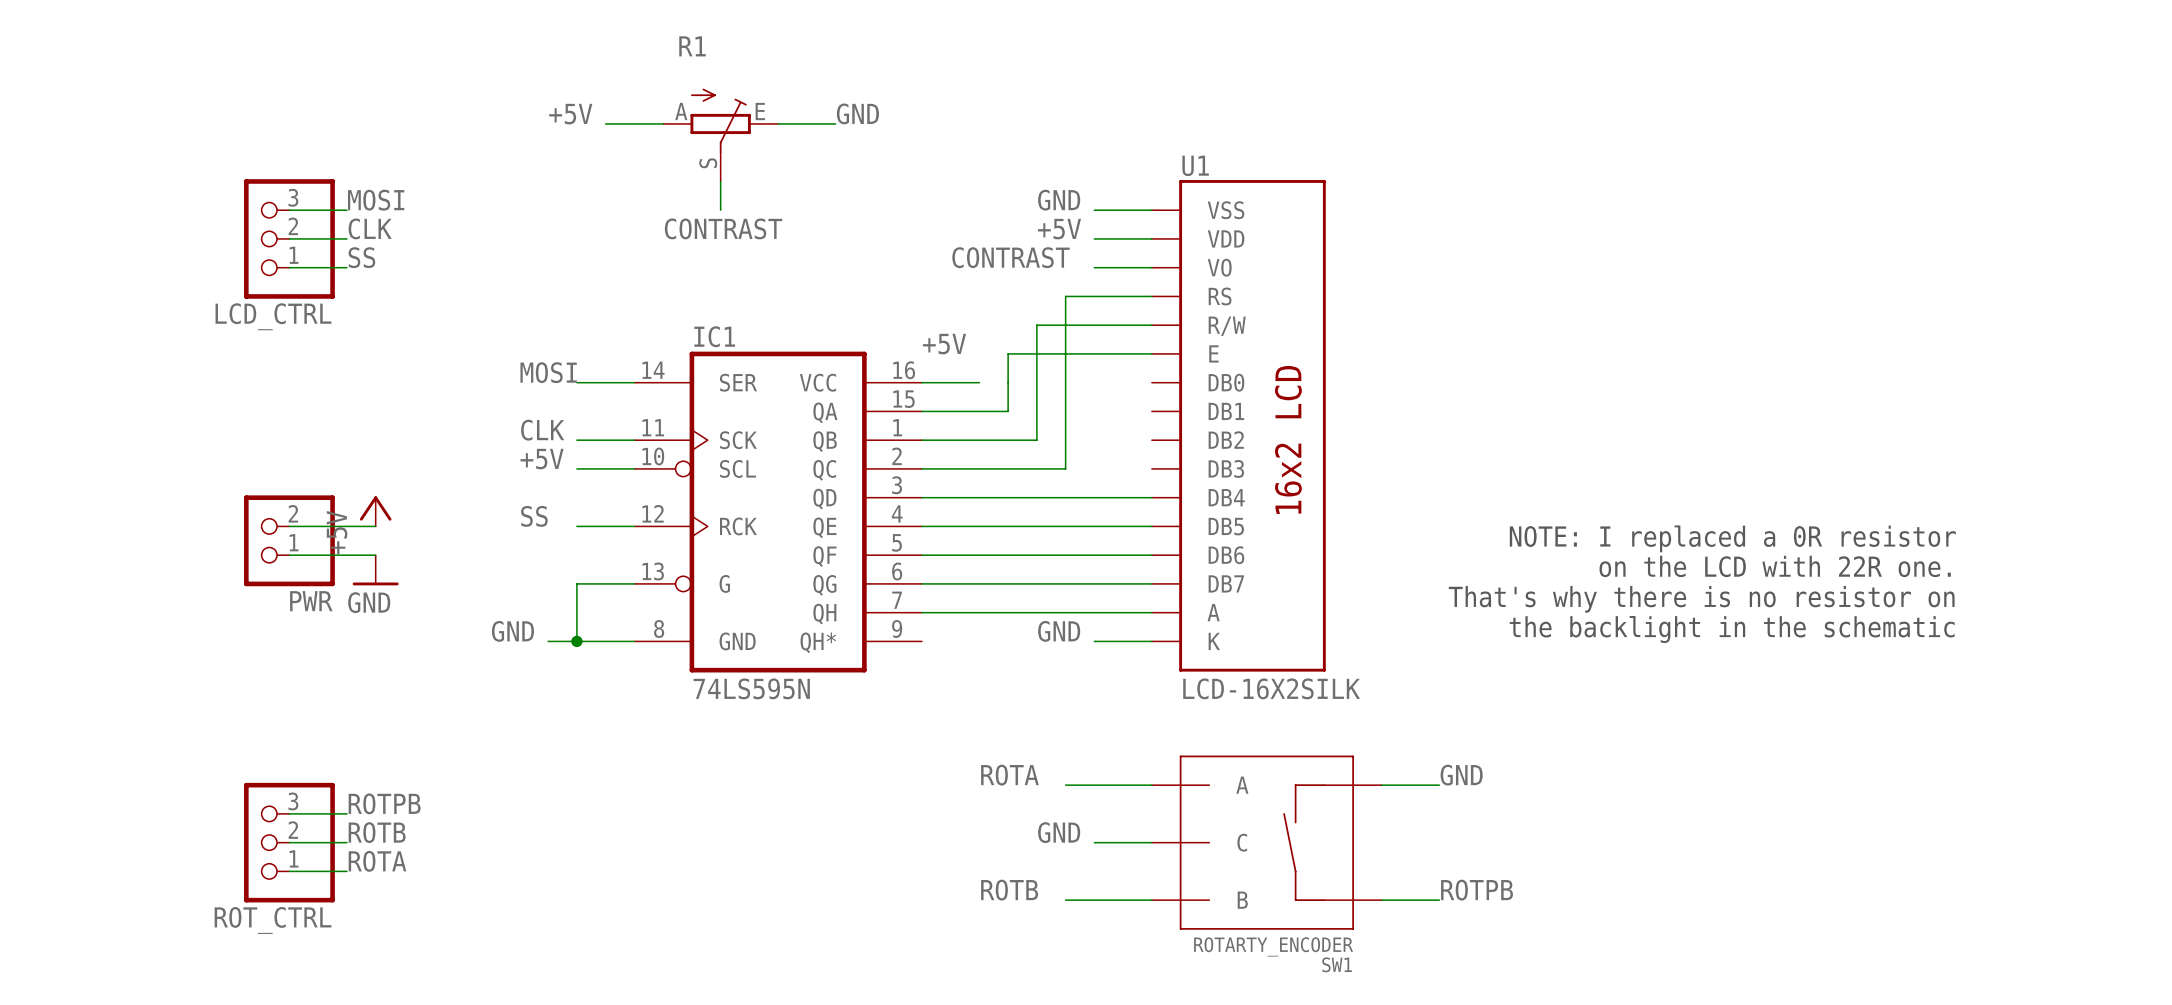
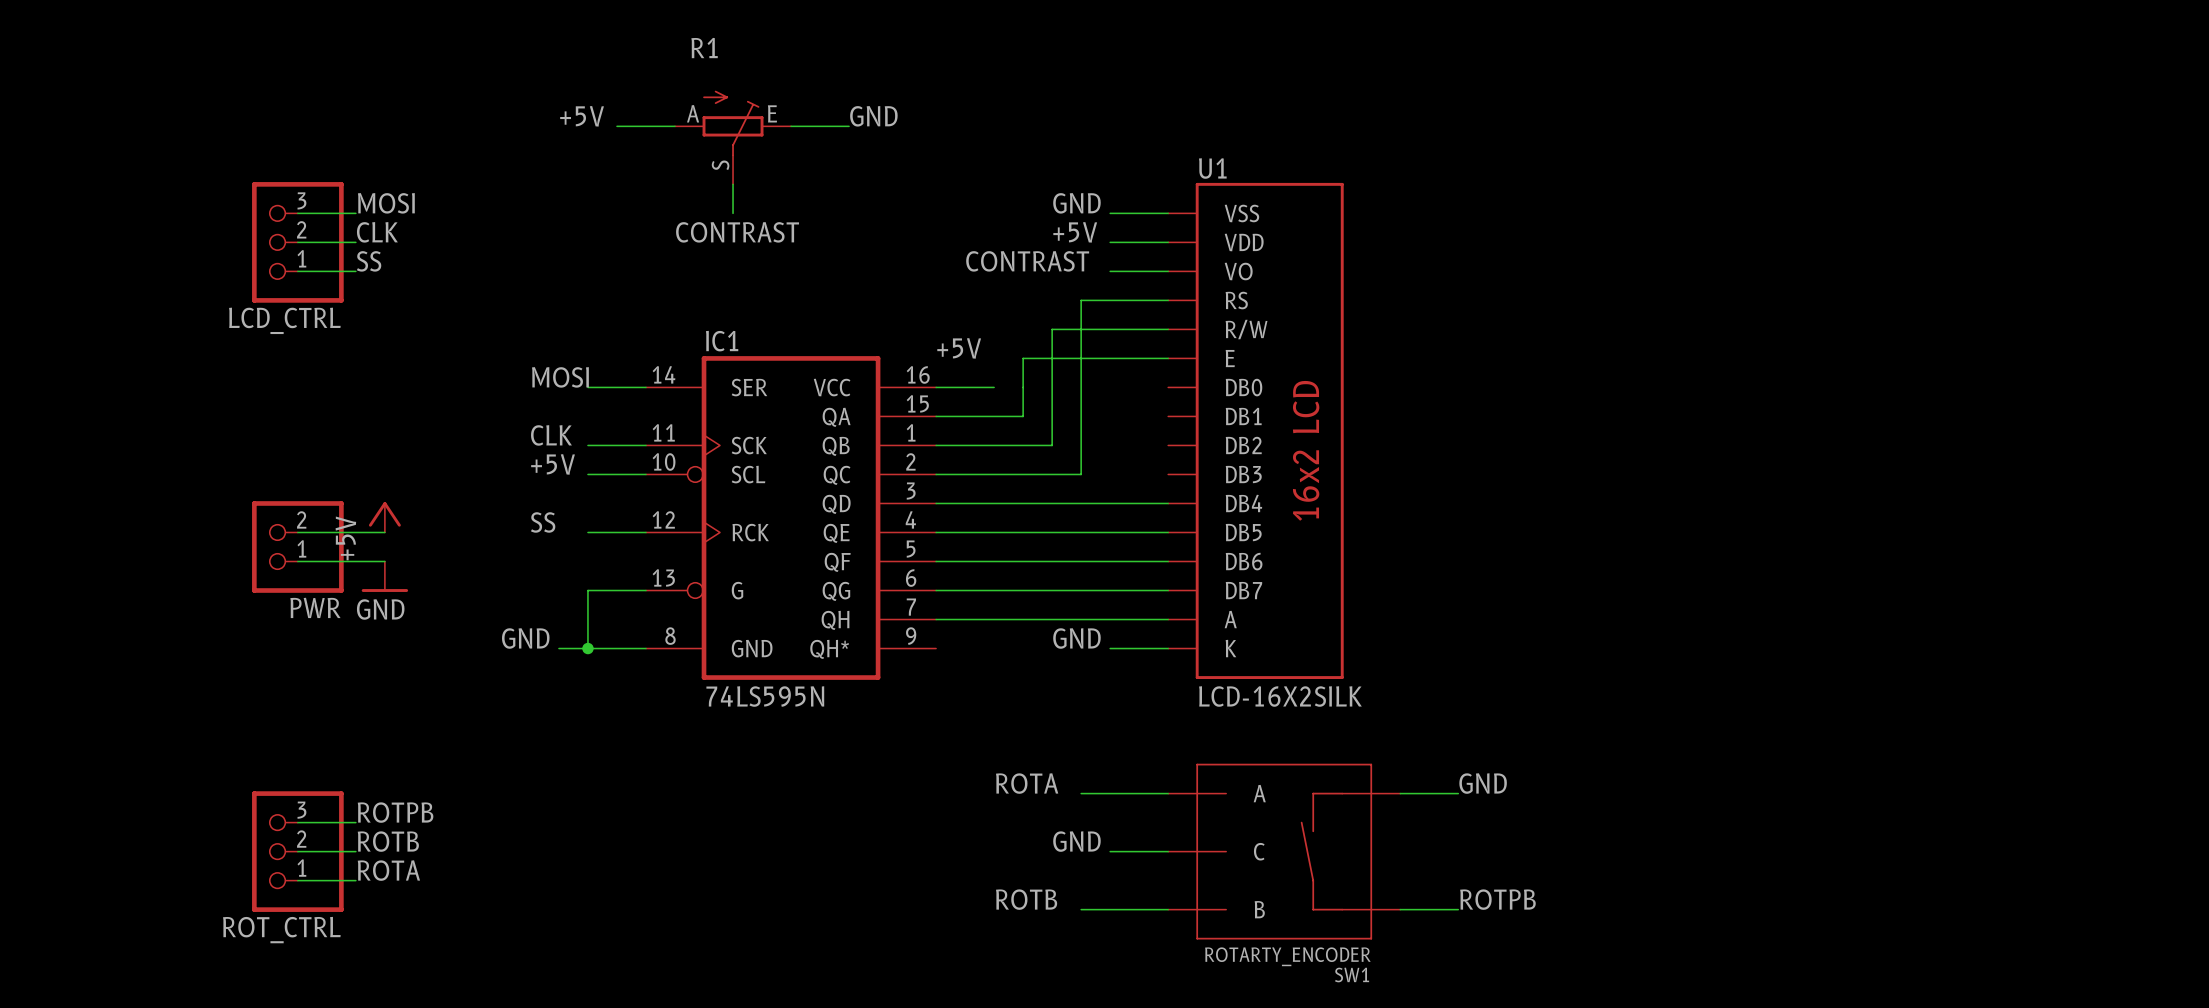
text: NOTE: I replaced a 0R resistor (1732, 538) -> none
text: on the LCD with 22R one. (1775, 566) -> none
text: That's why there is no resistor on (1701, 599) -> none
text: the backlight in the schematic (1732, 629) -> none

